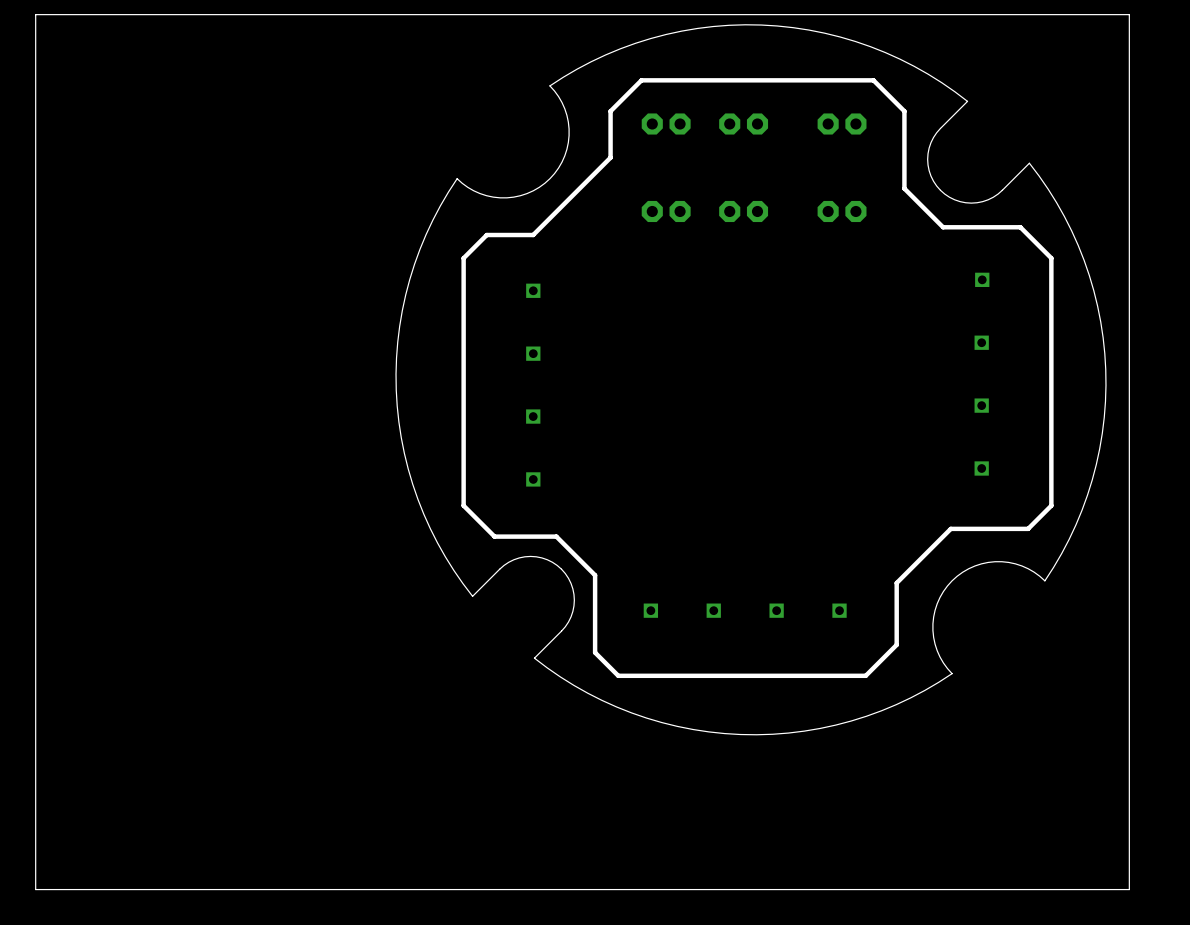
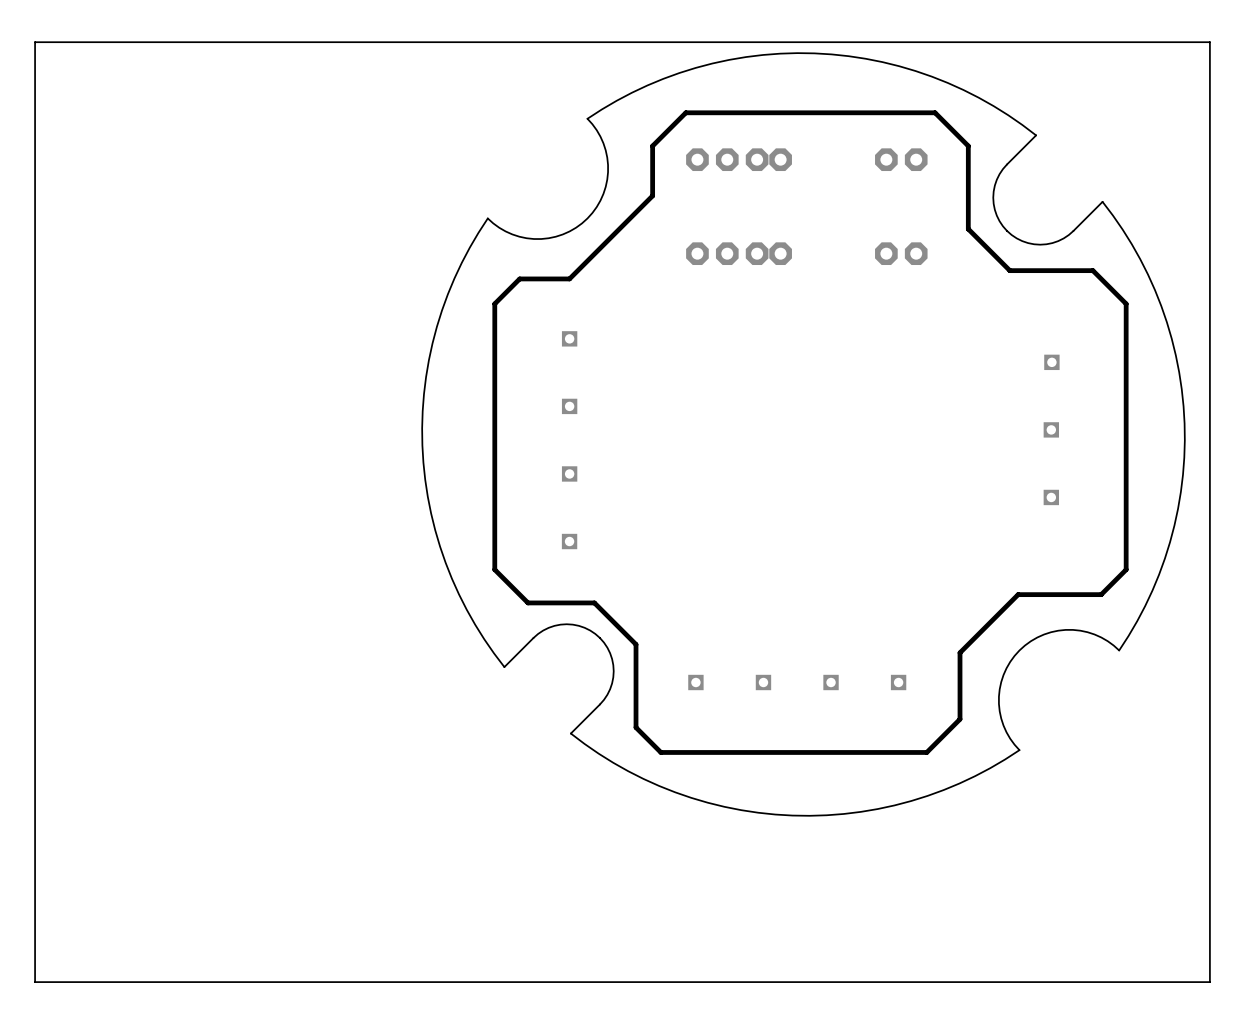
part position: (757, 123) -> (757, 159)
part position: (757, 211) -> (757, 253)
part: (982, 279) -> none
part: none -> (1051, 362)
part: (981, 342) -> none
part: none -> (1051, 429)
part: (981, 405) -> none
part: none -> (1051, 497)
part: (981, 468) -> none

